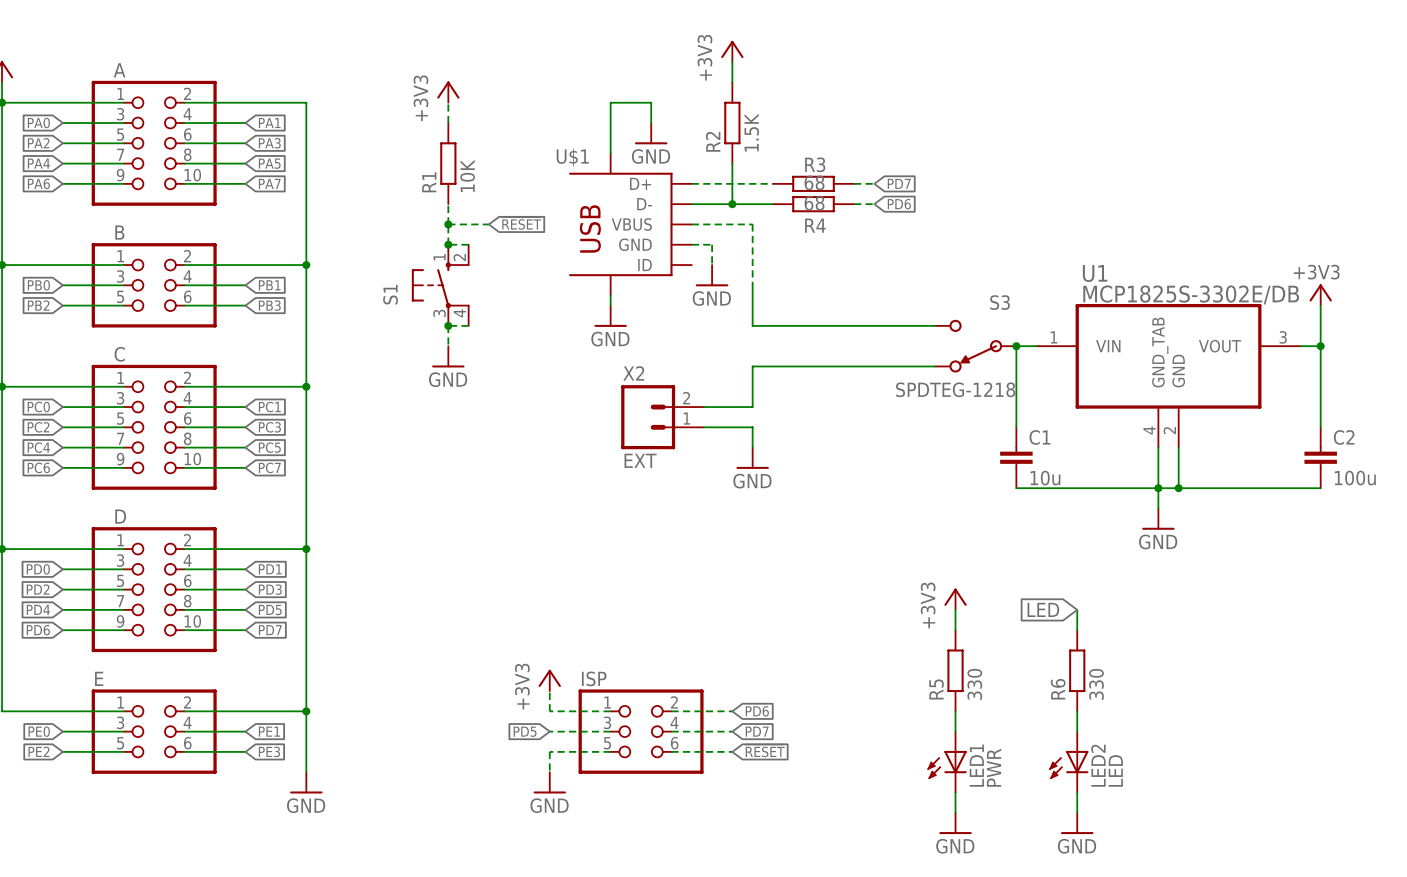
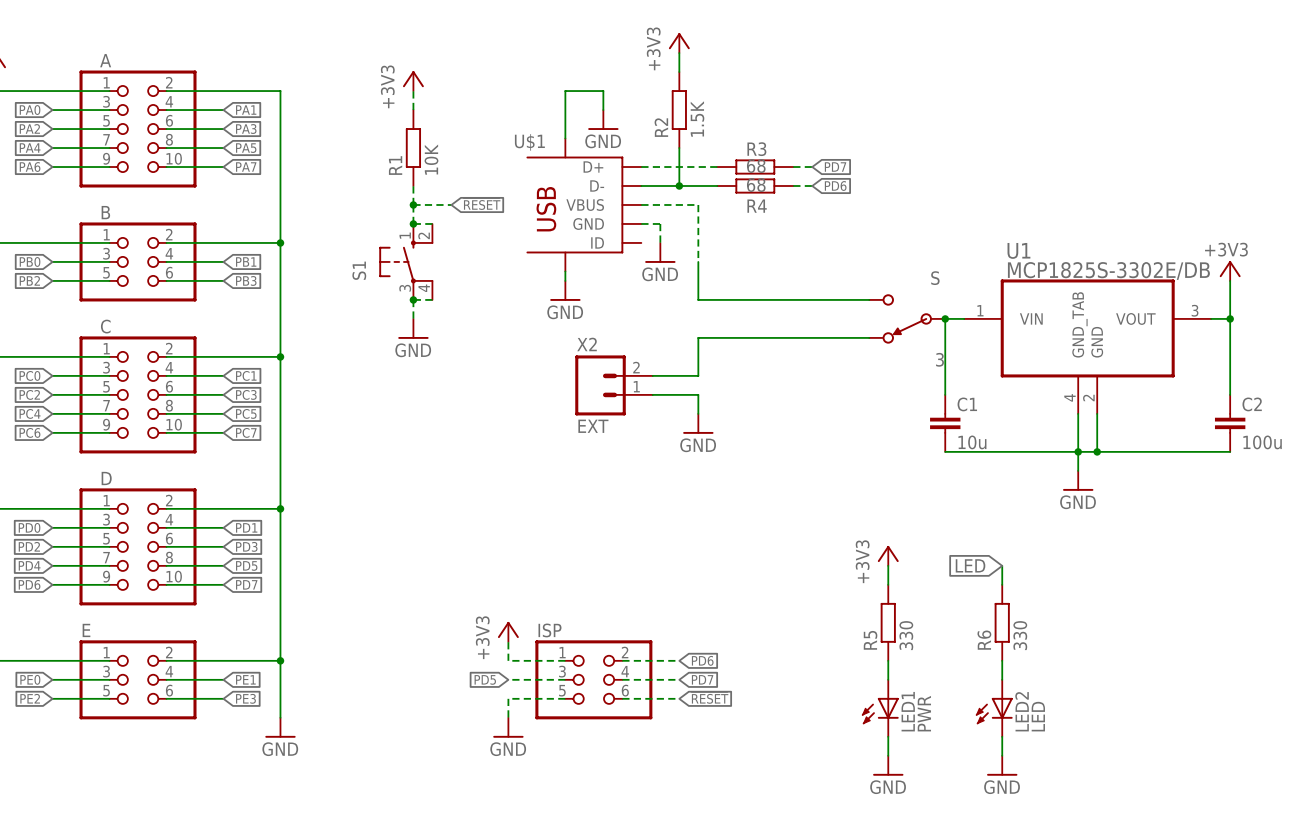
S3 name: S3 (1000, 302) -> S (935, 278)
S3 value: SPDTEG-1218 (955, 389) -> 3 (940, 359)

